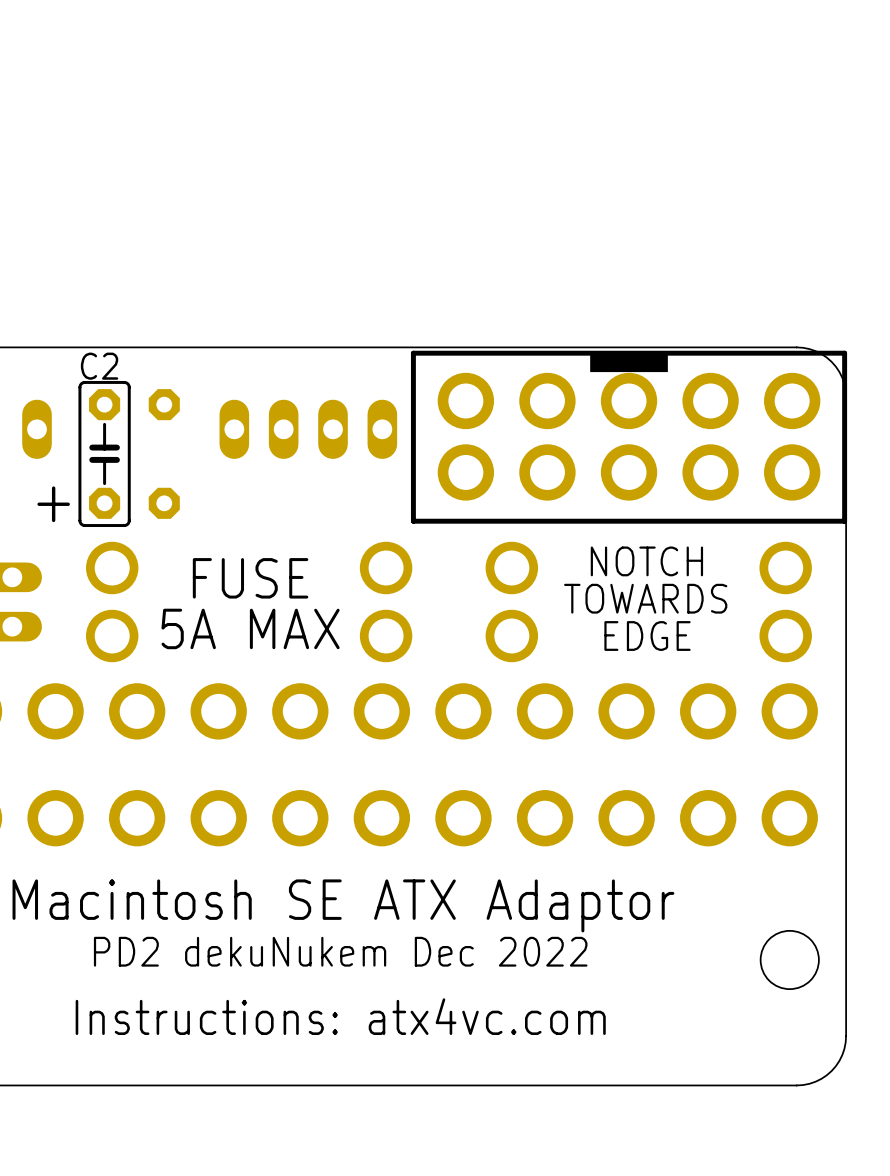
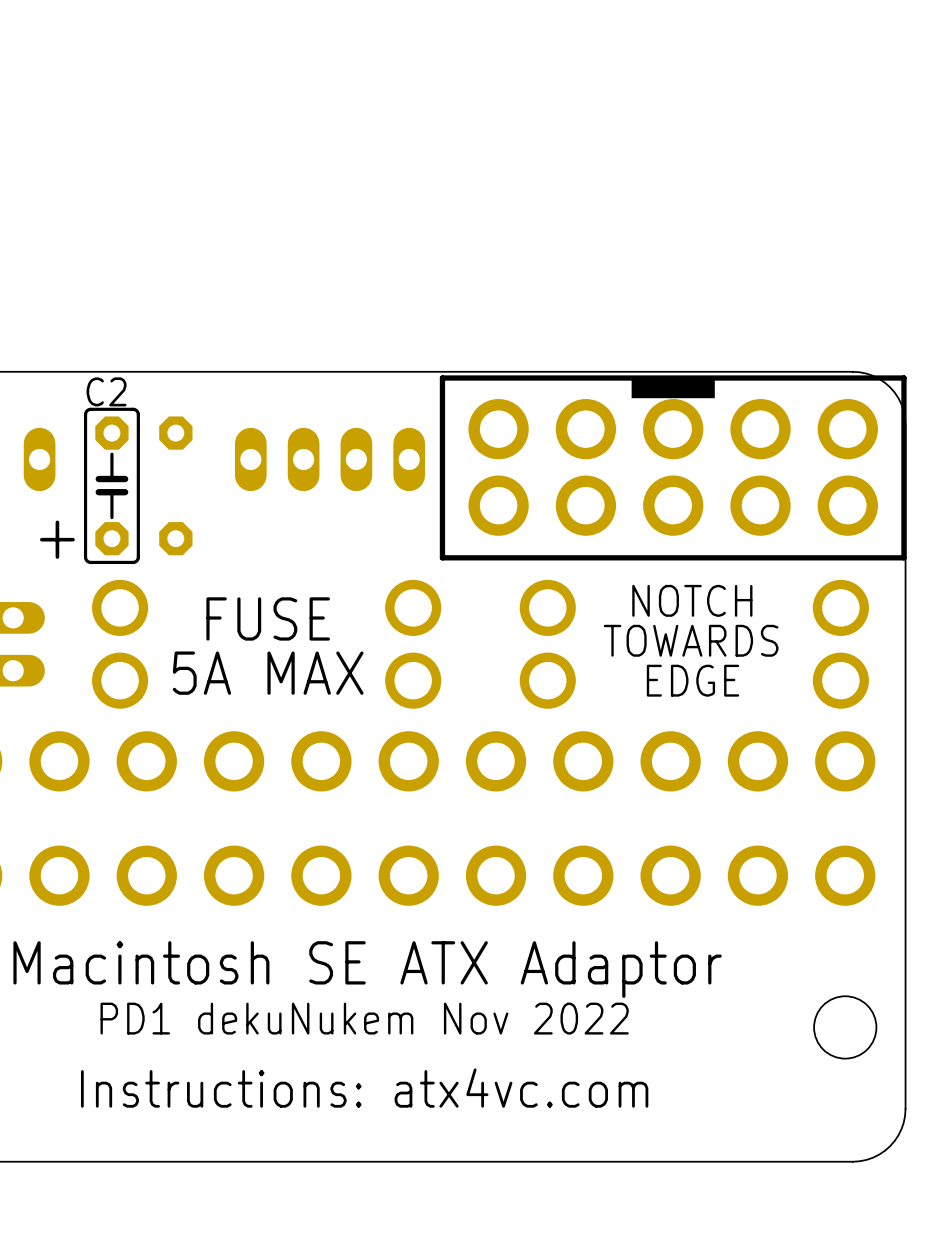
text: PD2 dekuNukem Dec 2022 (340, 951) -> PD1 dekuNukem Nov 2022 (364, 1018)

